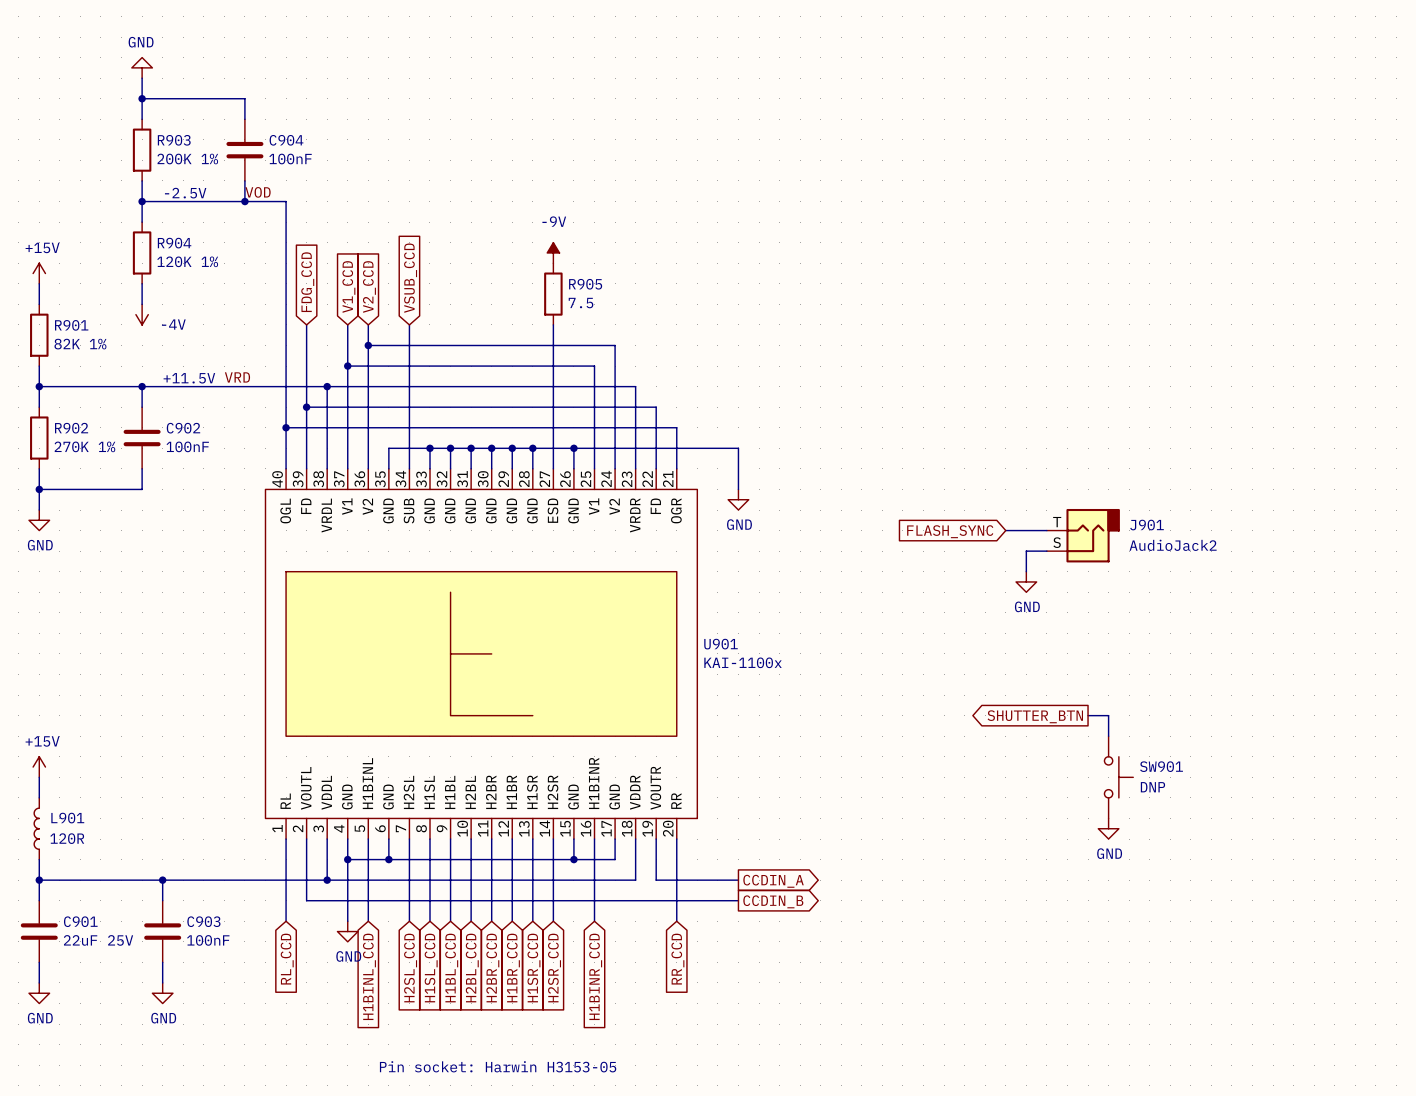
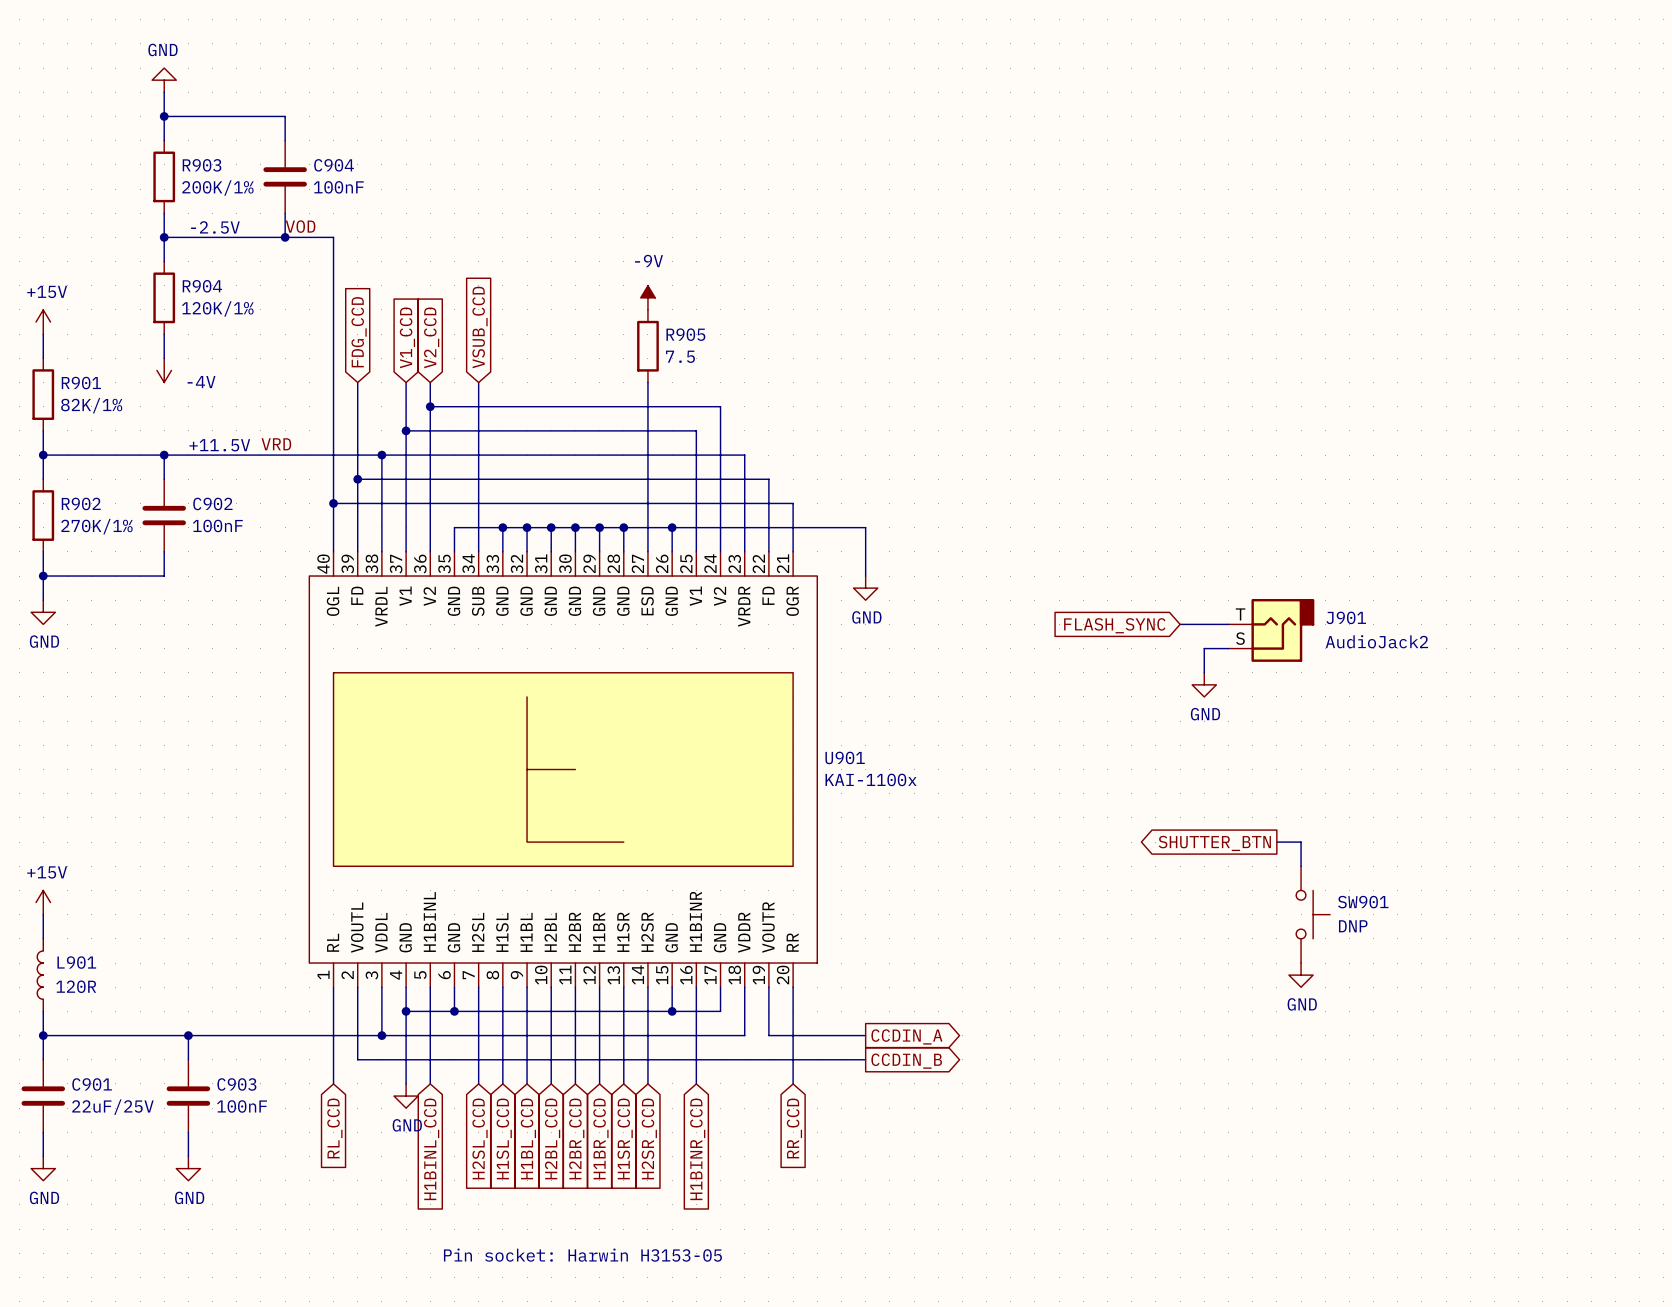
R903 value: 200K 1% (187, 159) -> 200K/1% (217, 188)
R904 value: 120K 1% (187, 261) -> 120K/1% (217, 308)
R901 value: 82K 1% (80, 344) -> 82K/1% (91, 405)
R902 value: 270K 1% (84, 446) -> 270K/1% (97, 526)
C901 value: 22uF 25V (98, 940) -> 22uF/25V (112, 1107)

